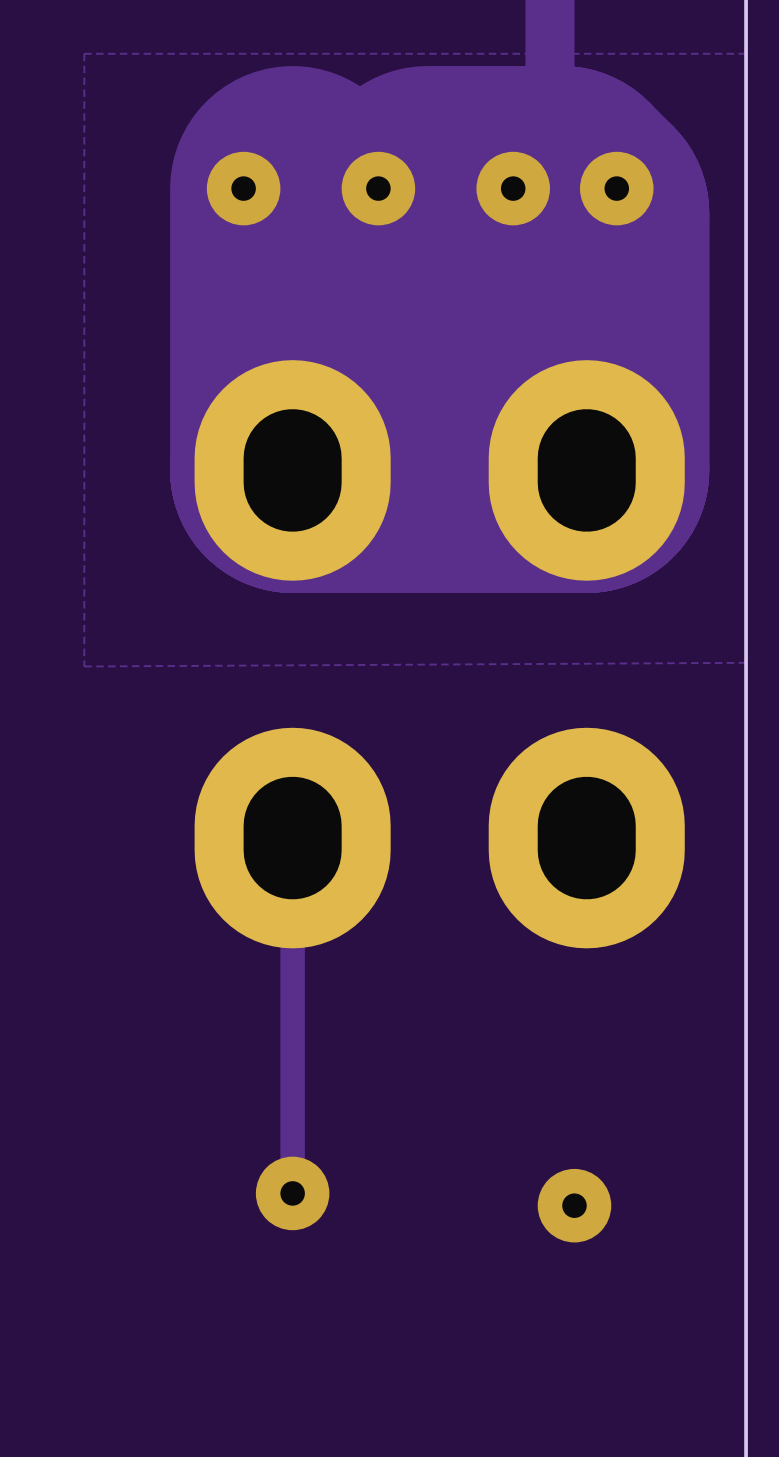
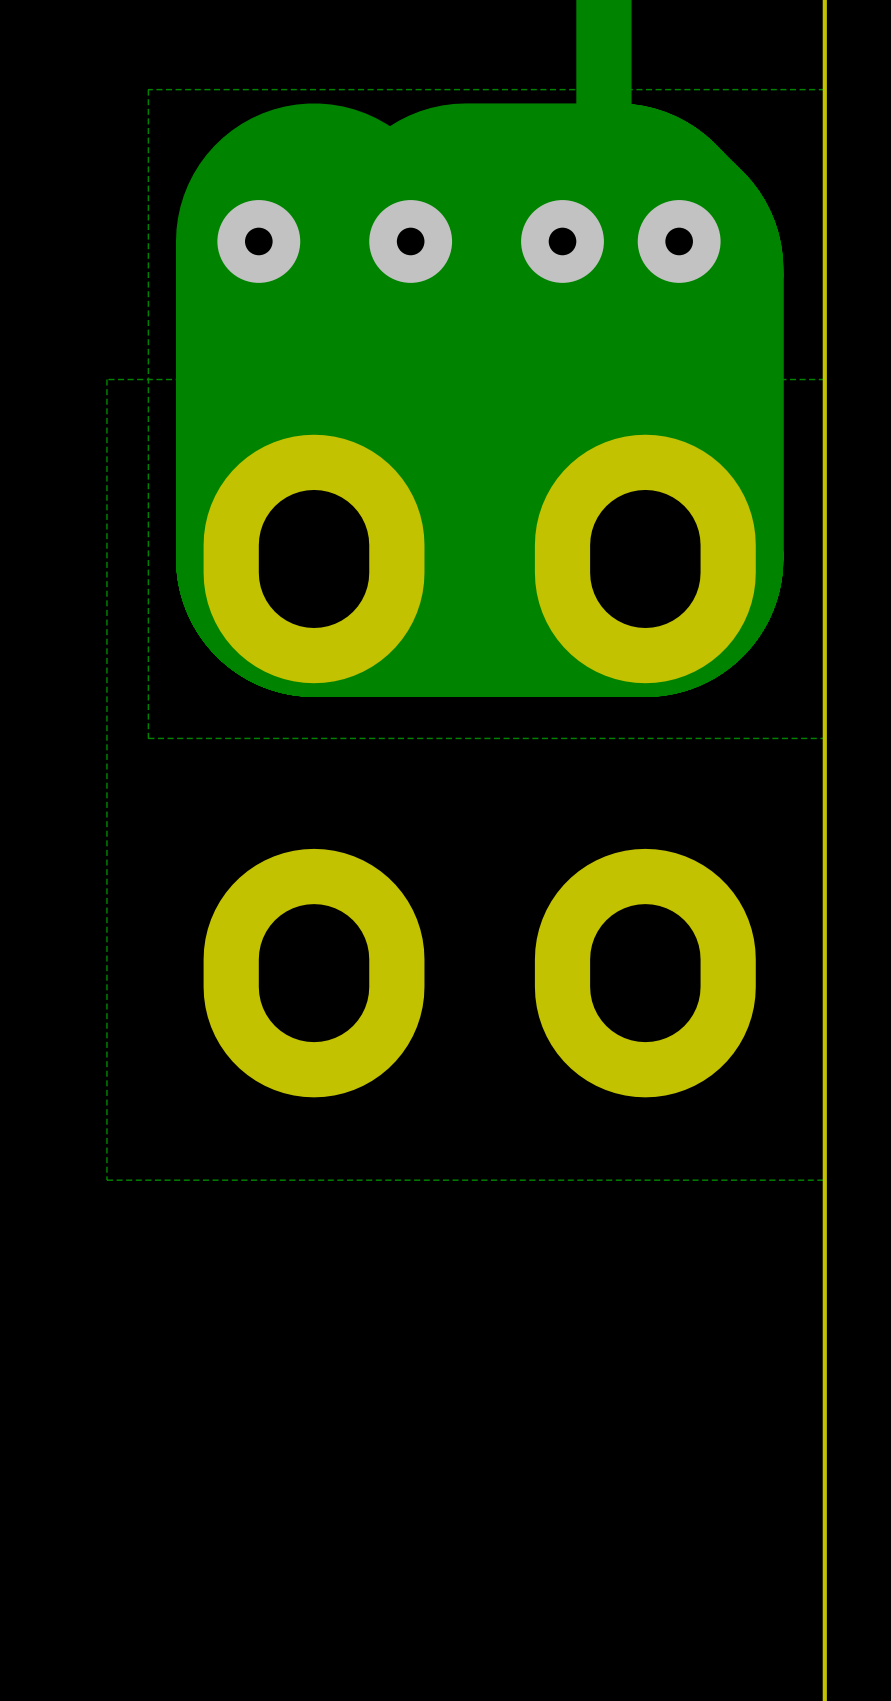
zone outline: (145, 53) (84, 53) (84, 666) (746, 662) -> (148, 89) (148, 738) (824, 738)
zone outline: none -> (824, 379) (106, 379) (106, 1180) (824, 1180)
track: (292, 838) (292, 1193) -> none
via: (292, 1193) -> none
via: (574, 1205) -> none

